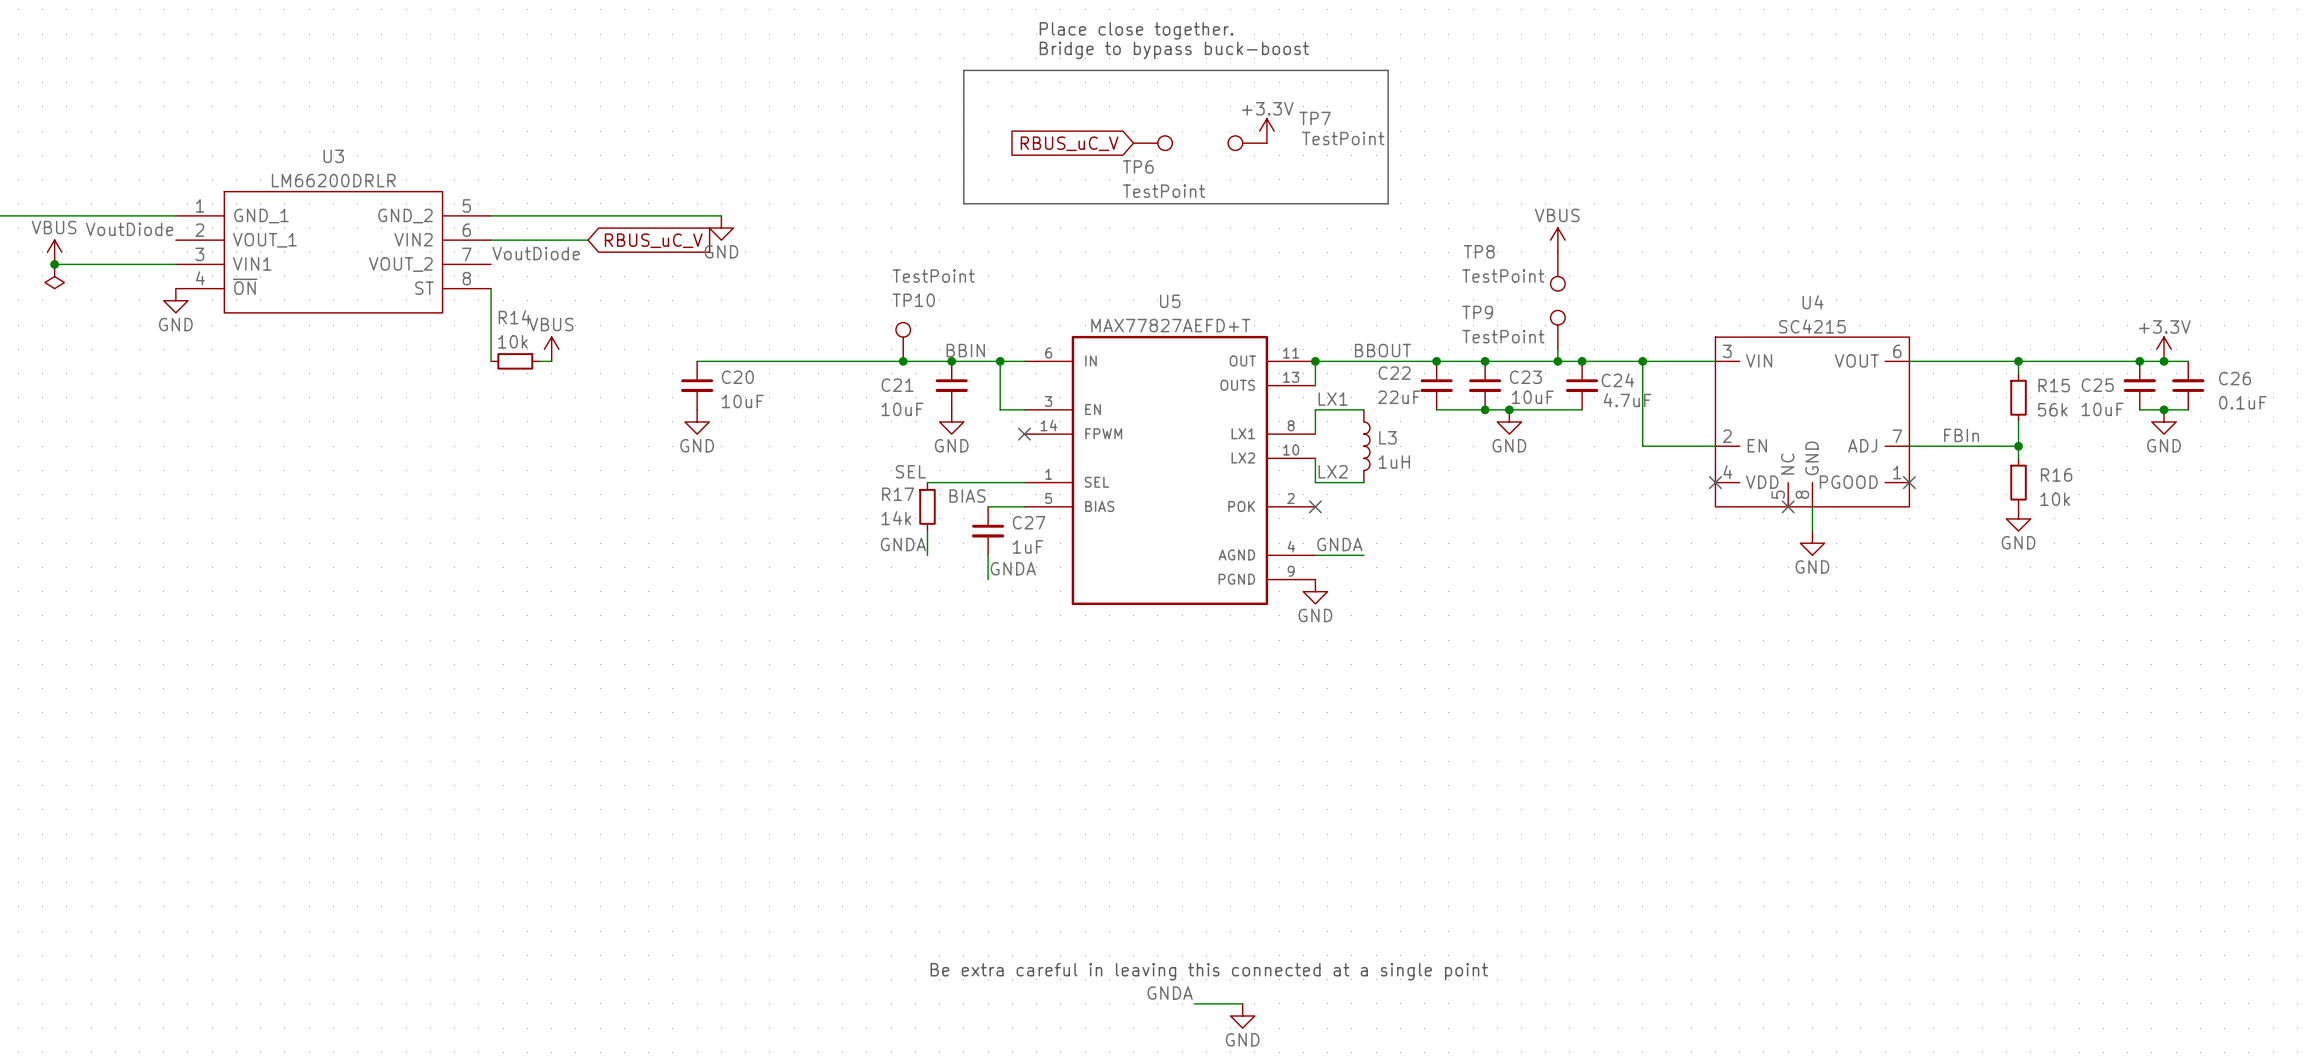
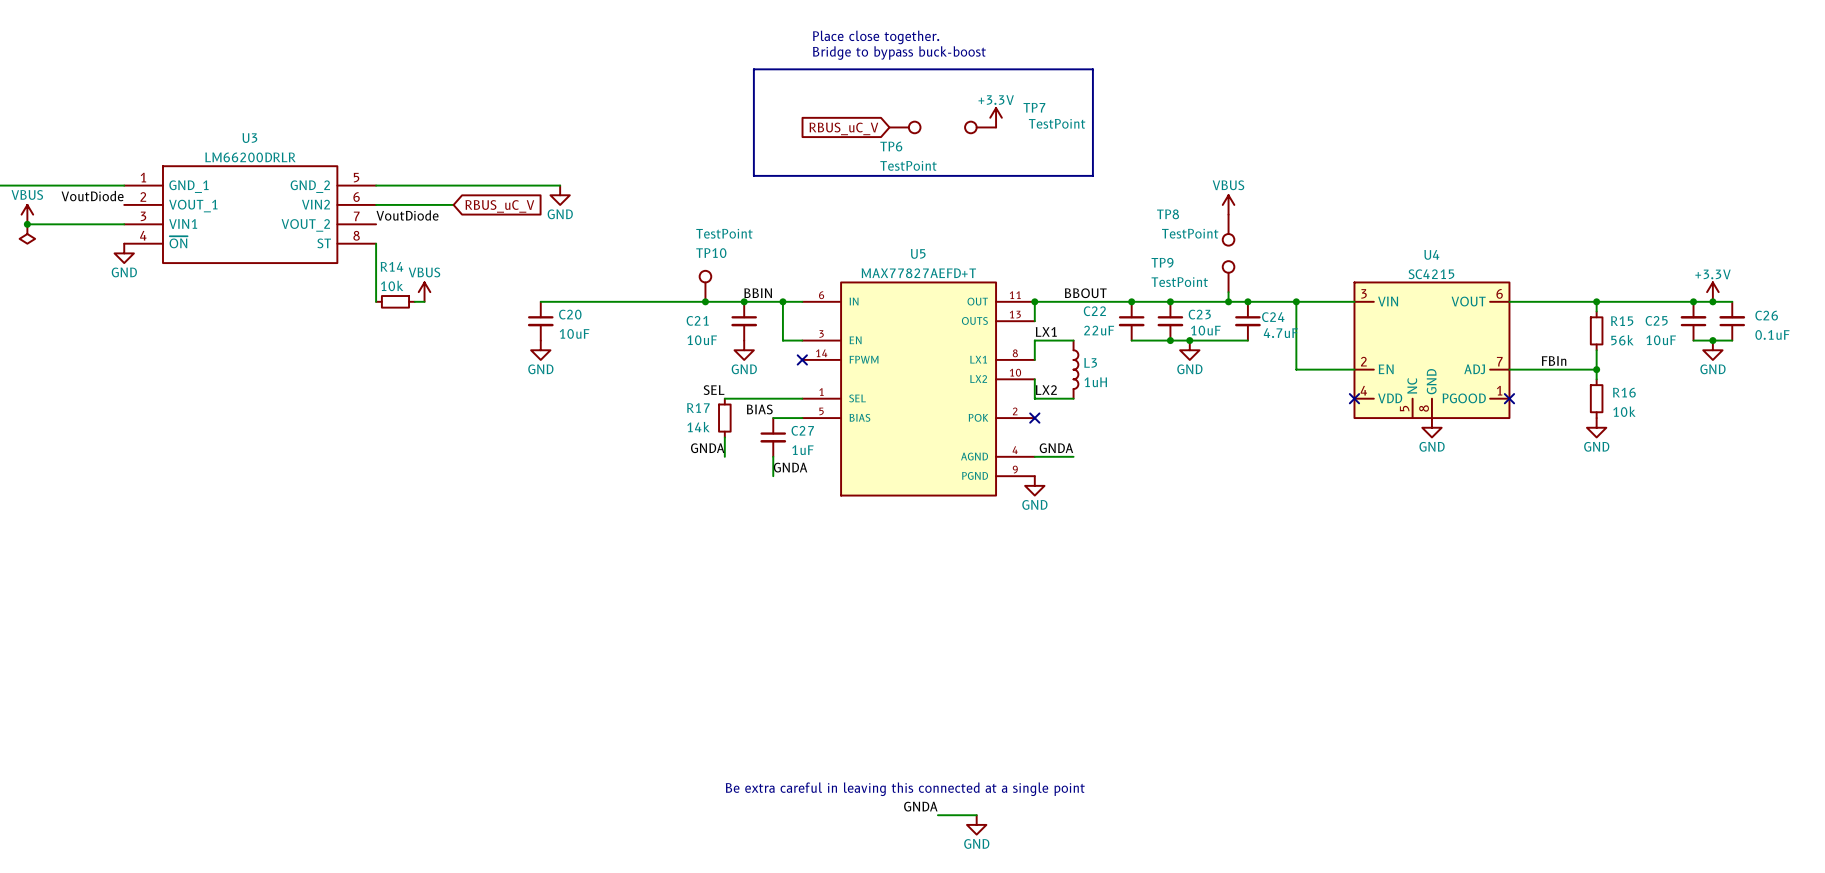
no-connect mark: (1788, 506) -> none
power symbol position: GND (1812, 543) -> GND (1431, 427)

